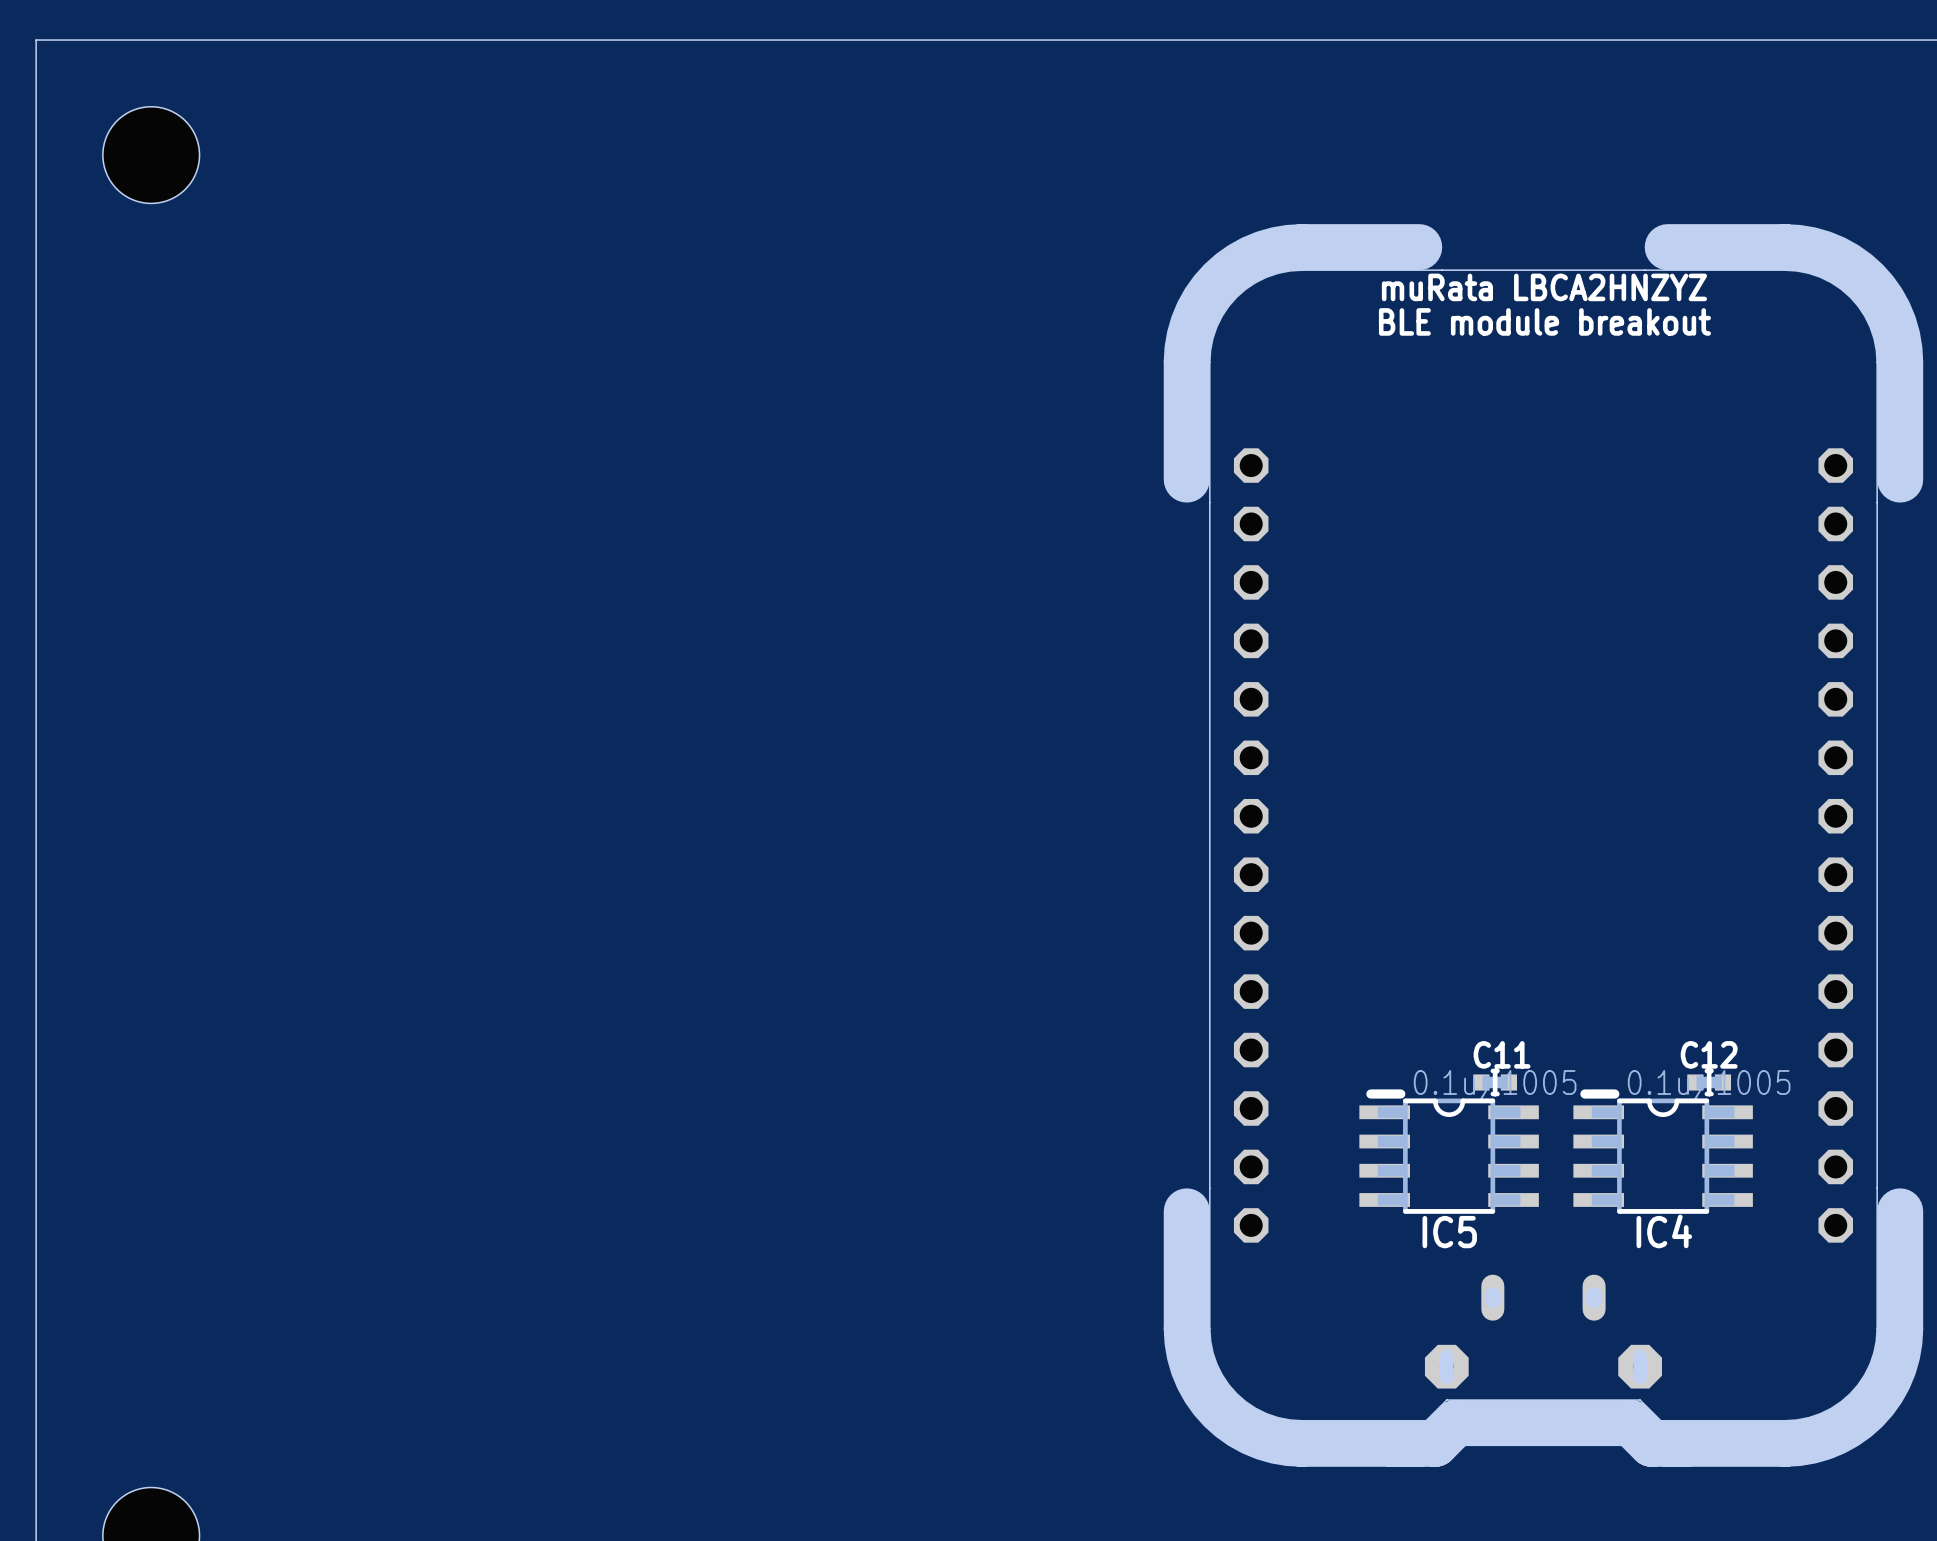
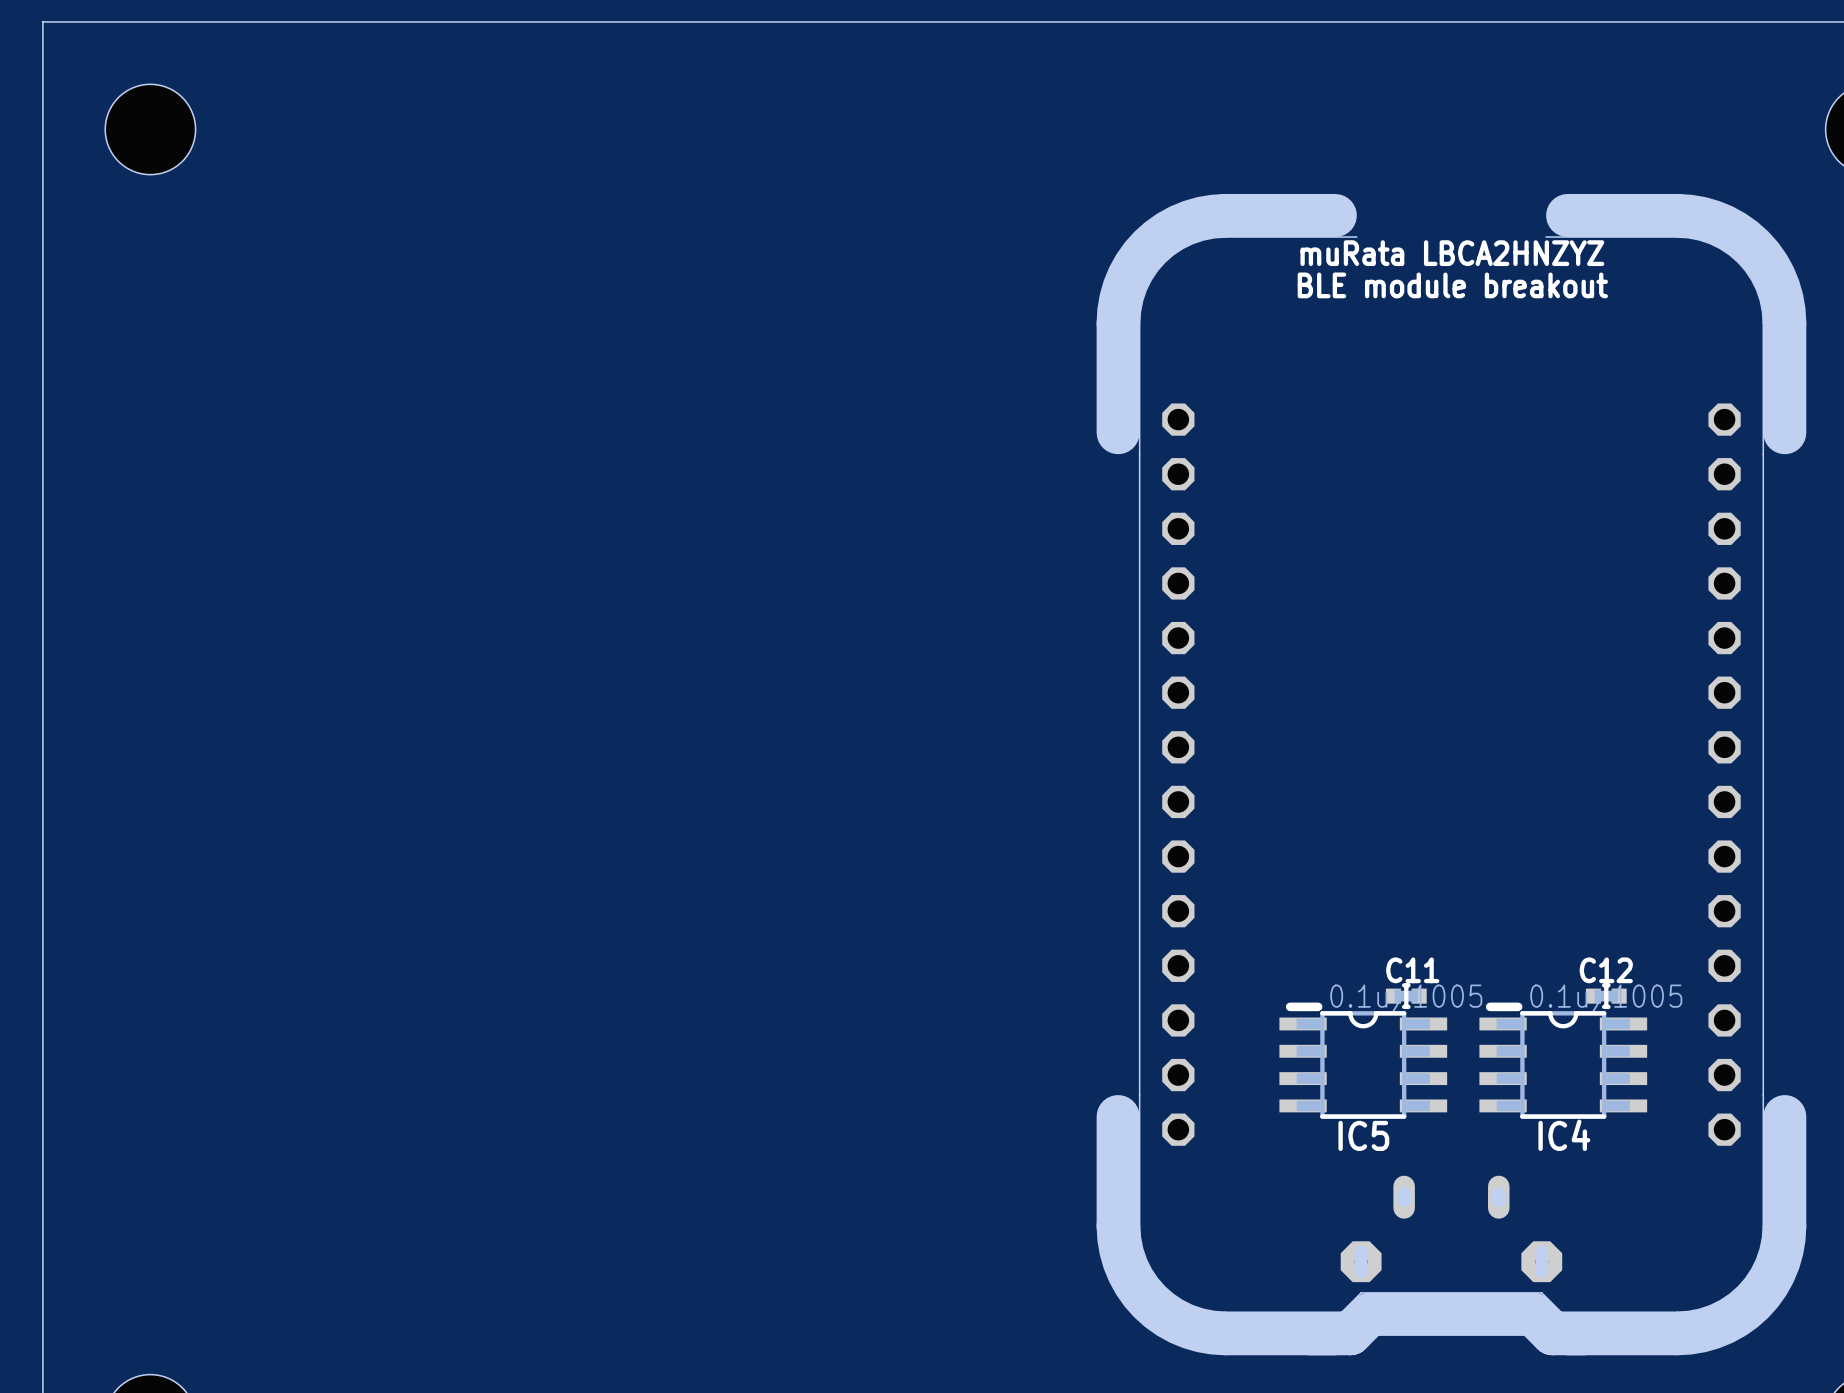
board edge: (1644, 270) (1442, 270) -> none

